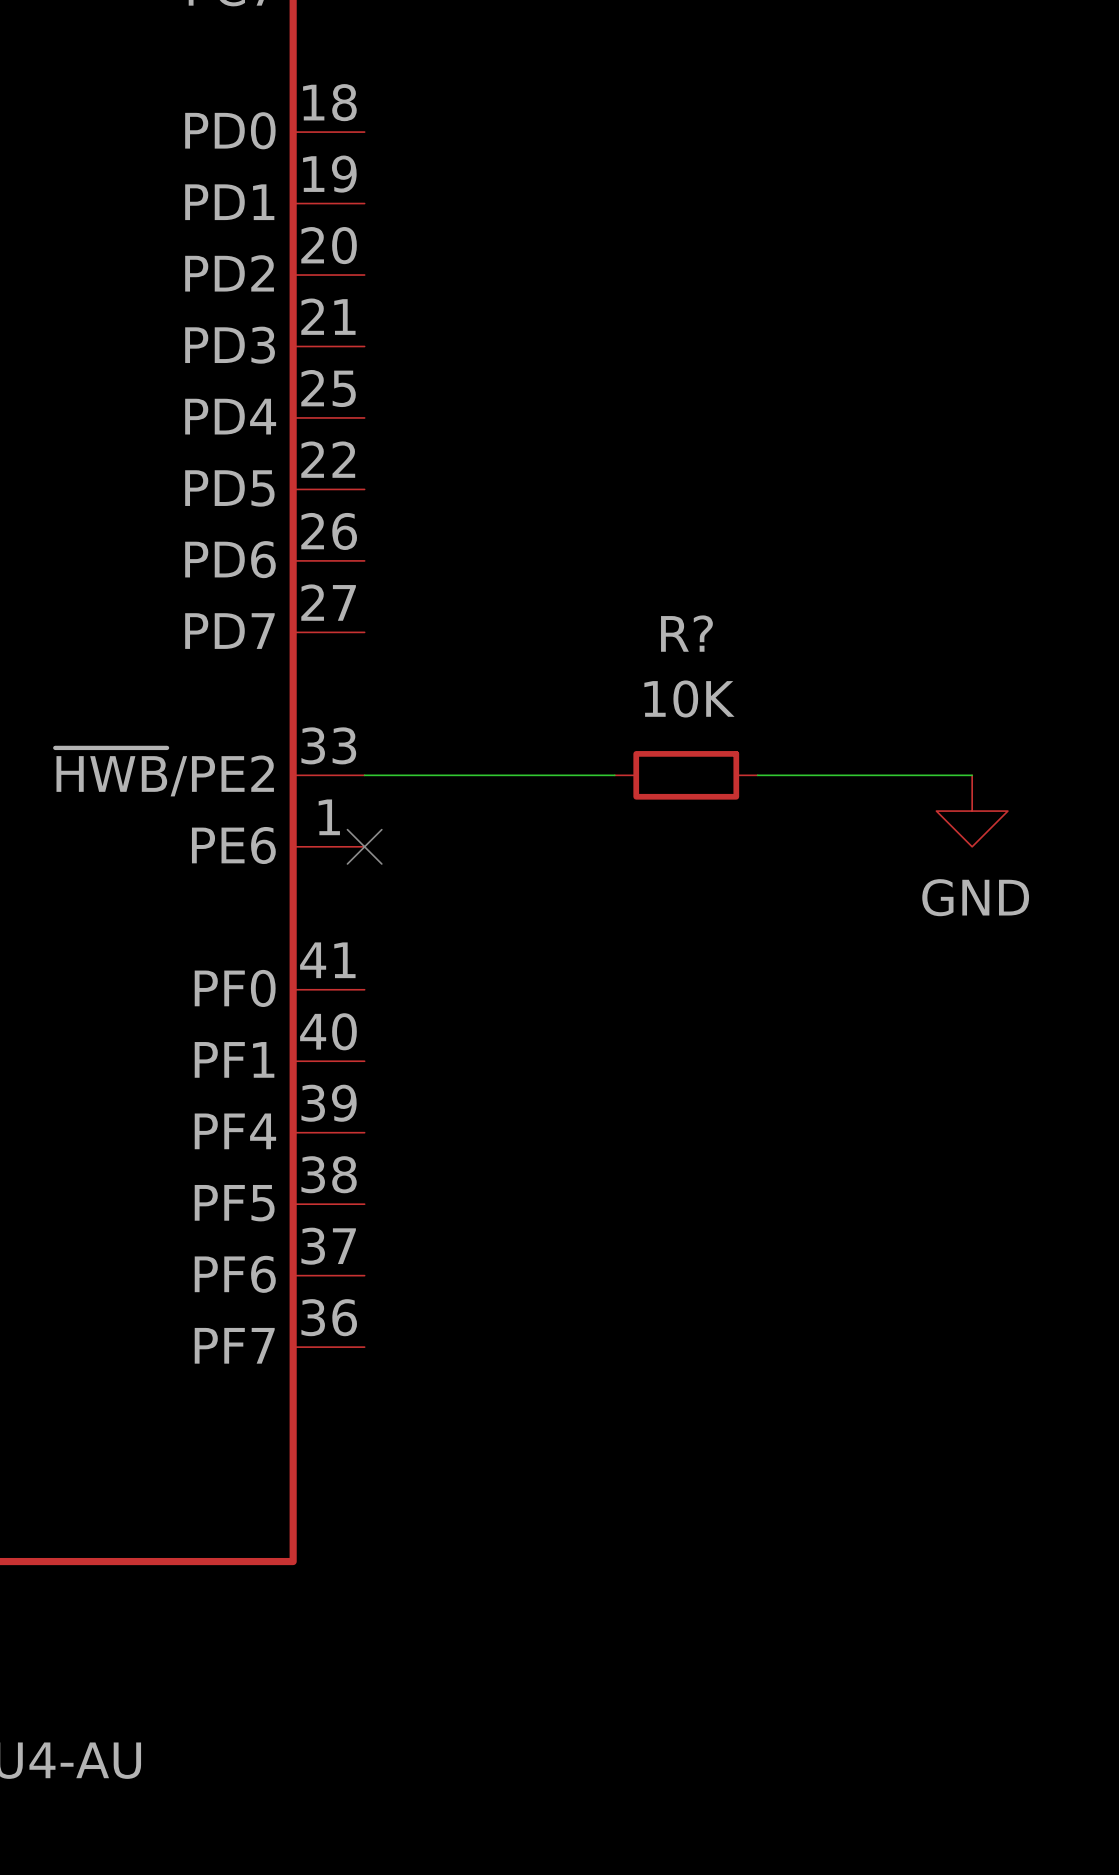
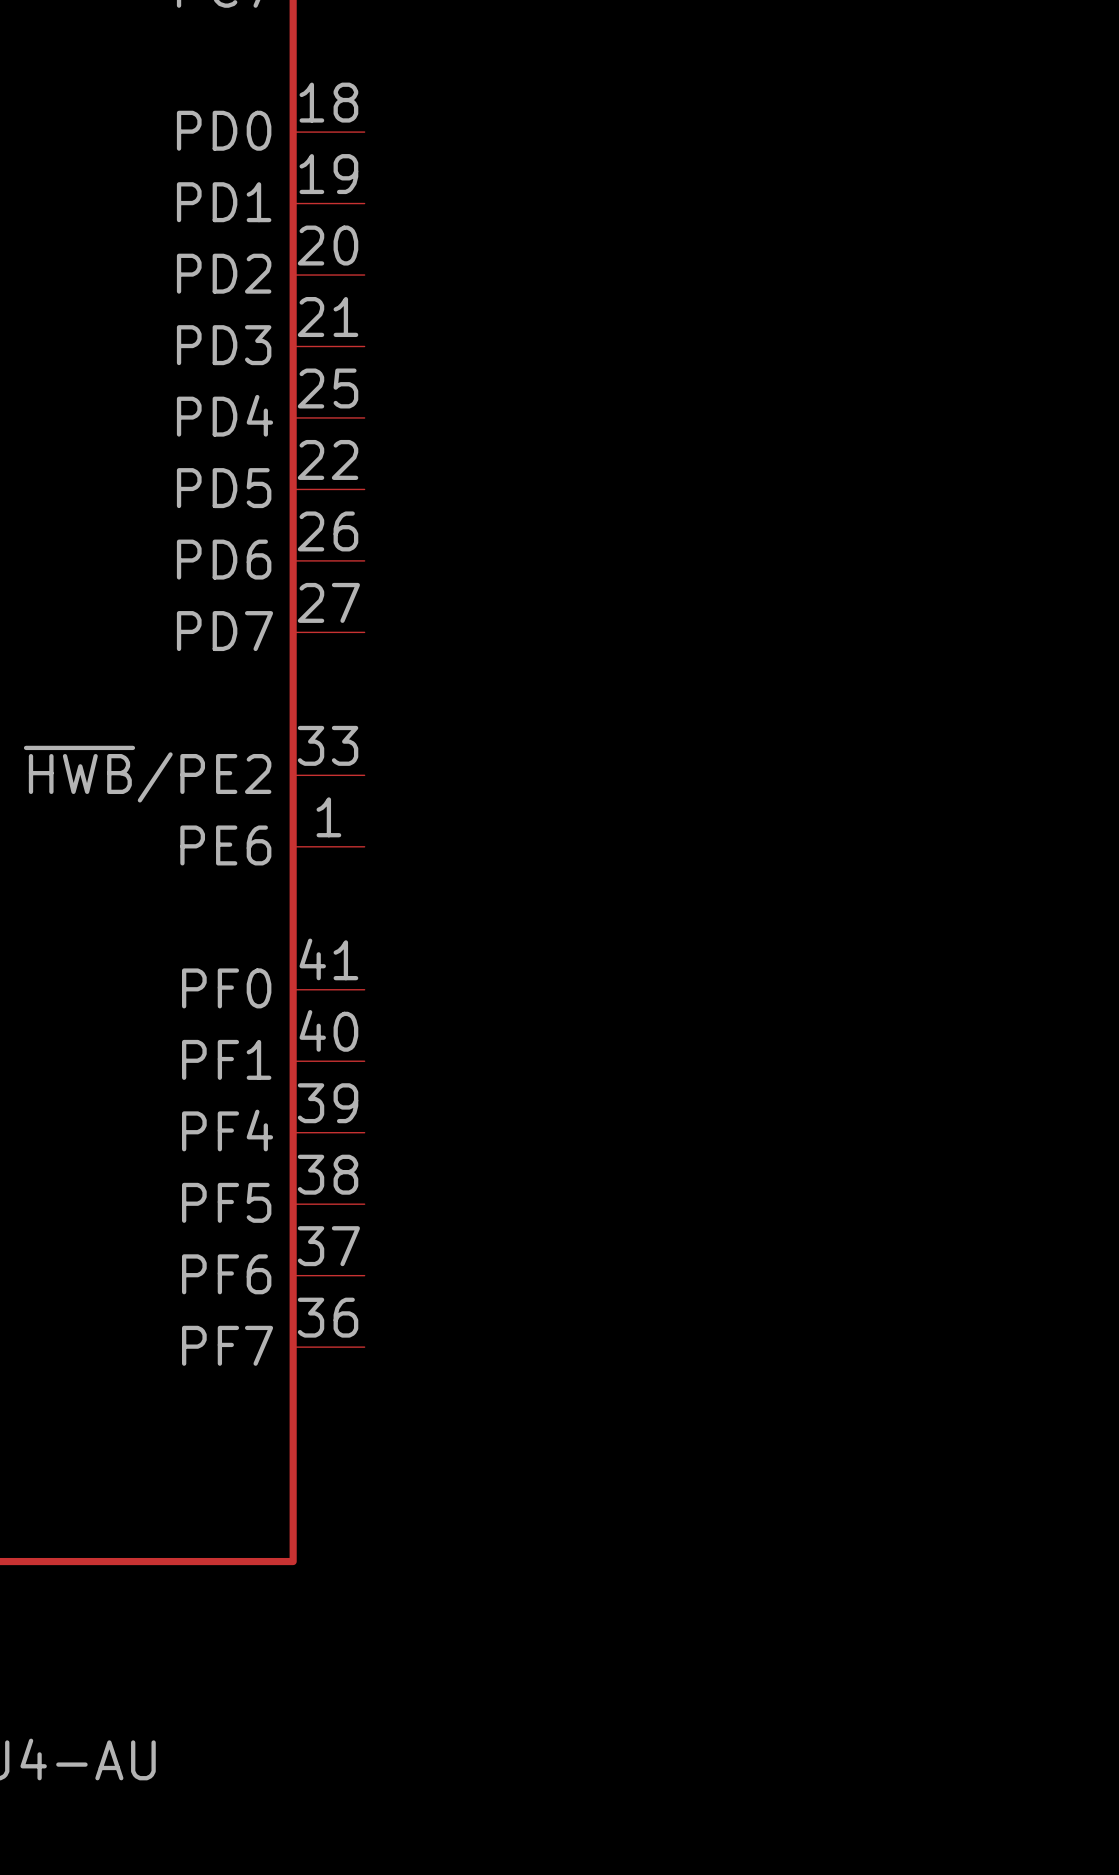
wire: (364, 775) (614, 775) -> none
R?: 10K (686, 775) -> none
wire: (757, 775) (972, 775) -> none
power symbol: GND (972, 811) -> none
no-connect mark: (364, 846) -> none

